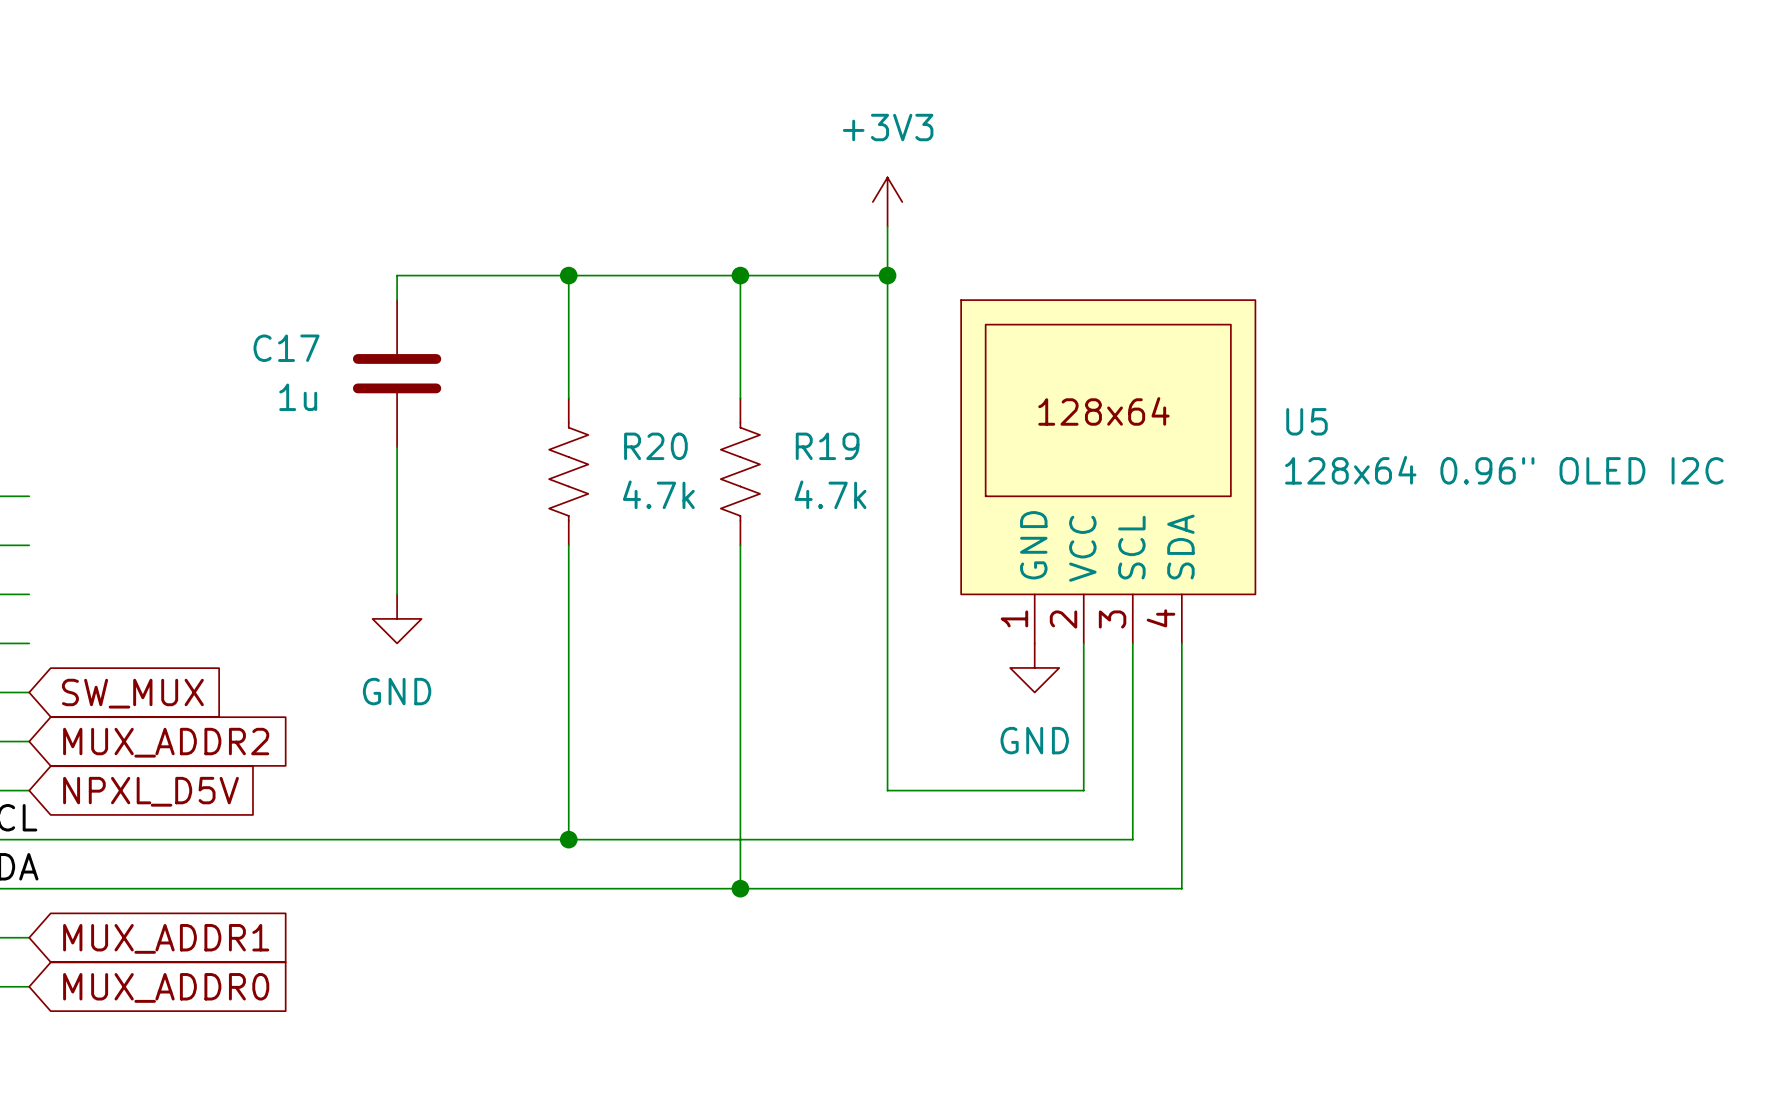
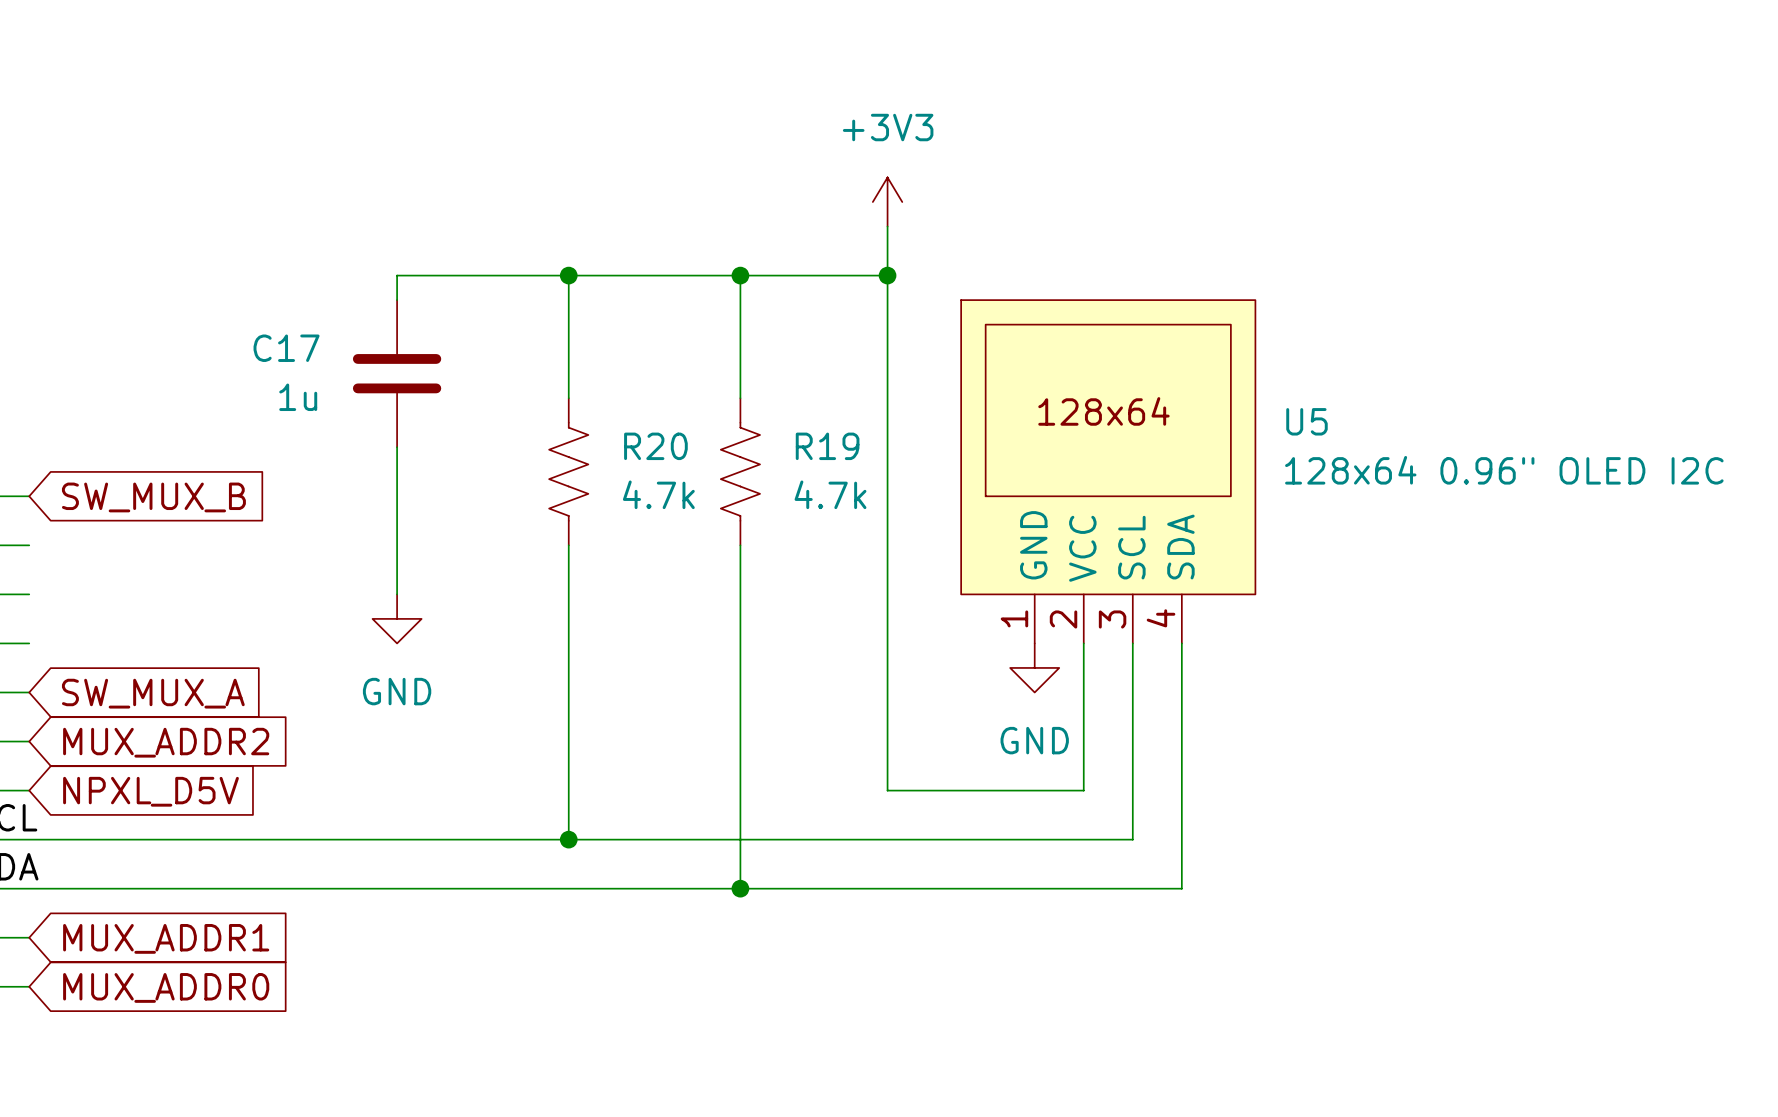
global label: none -> SW_MUX_B (153, 497)
global label: SW_MUX (132, 693) -> SW_MUX_A (153, 693)

